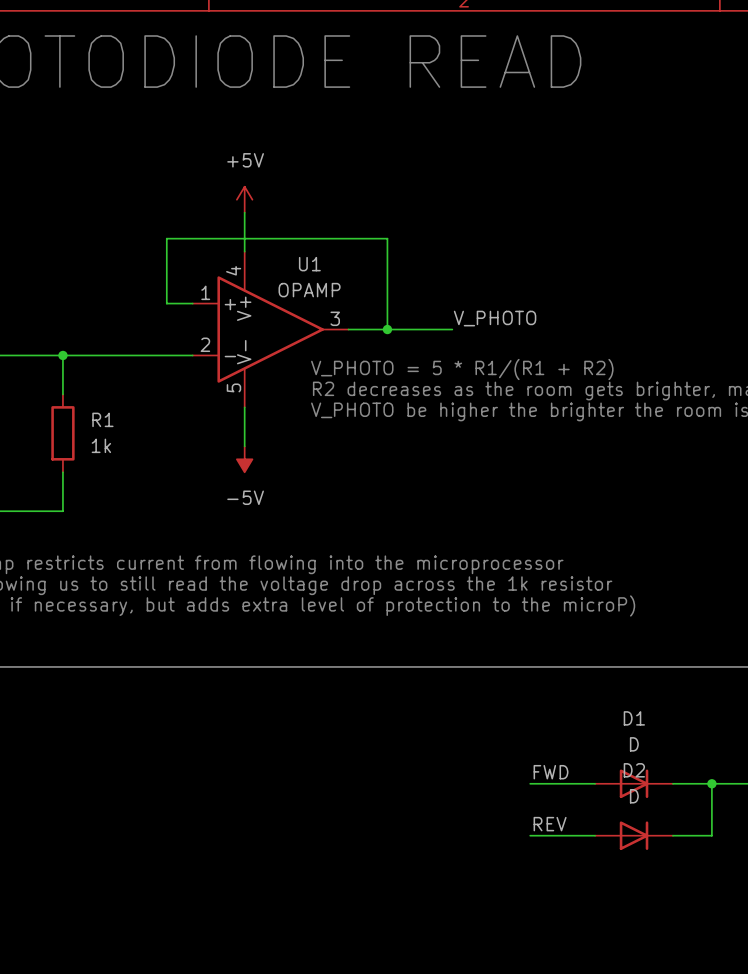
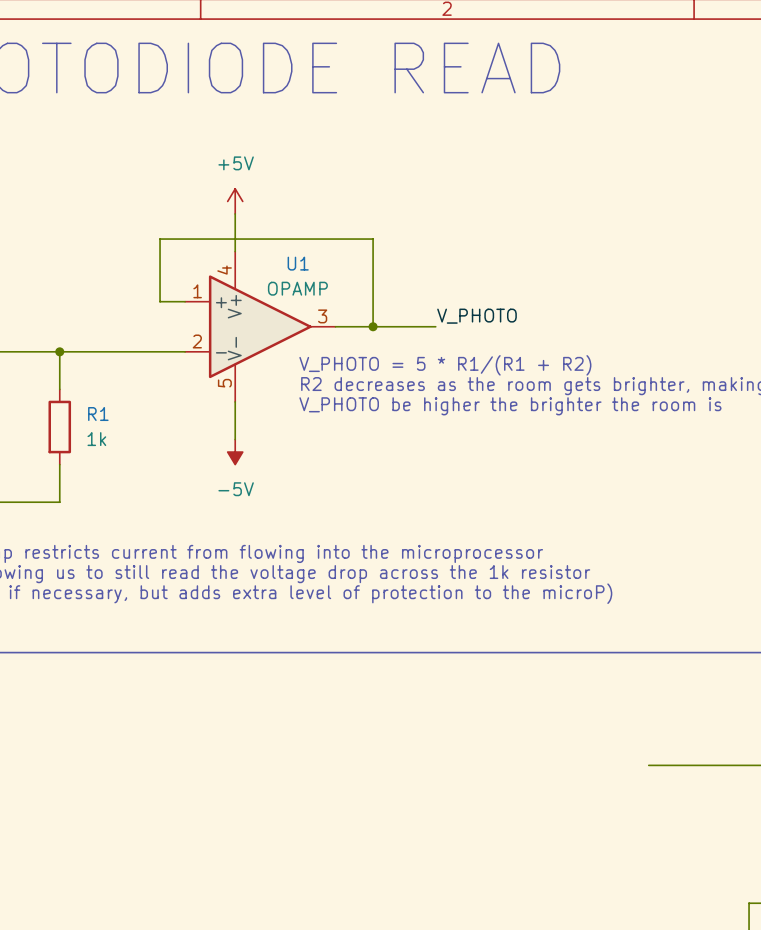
label: FWD (551, 772) -> none
wire: (530, 783) (595, 783) -> none
D1: D (634, 783) -> none
wire: (711, 783) (711, 835) (672, 835) -> none
junction: (711, 783) -> none
label: REV (550, 824) -> none
wire: (530, 835) (595, 835) -> none
D2: D (634, 835) -> none

